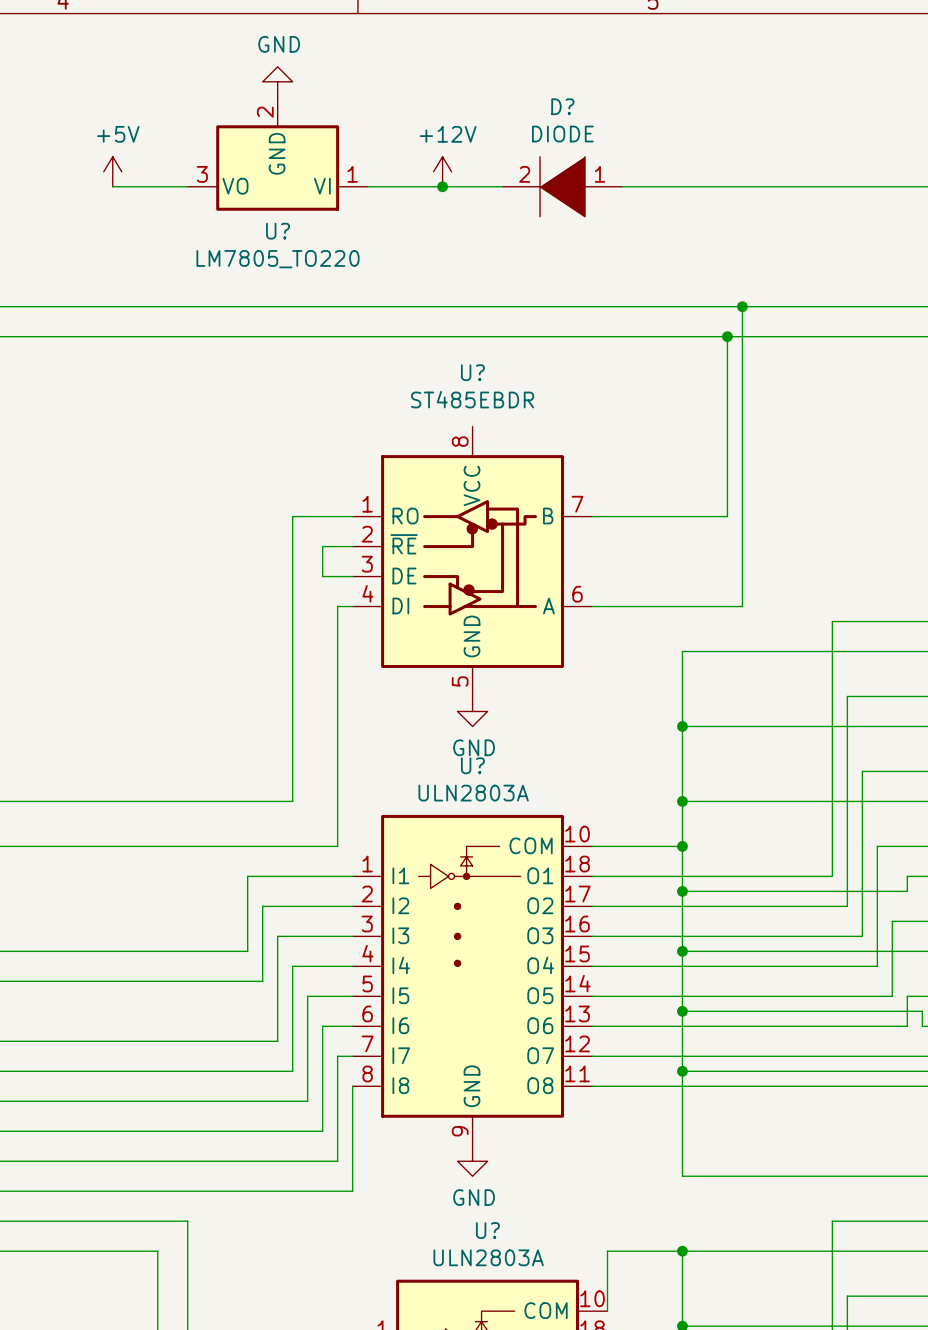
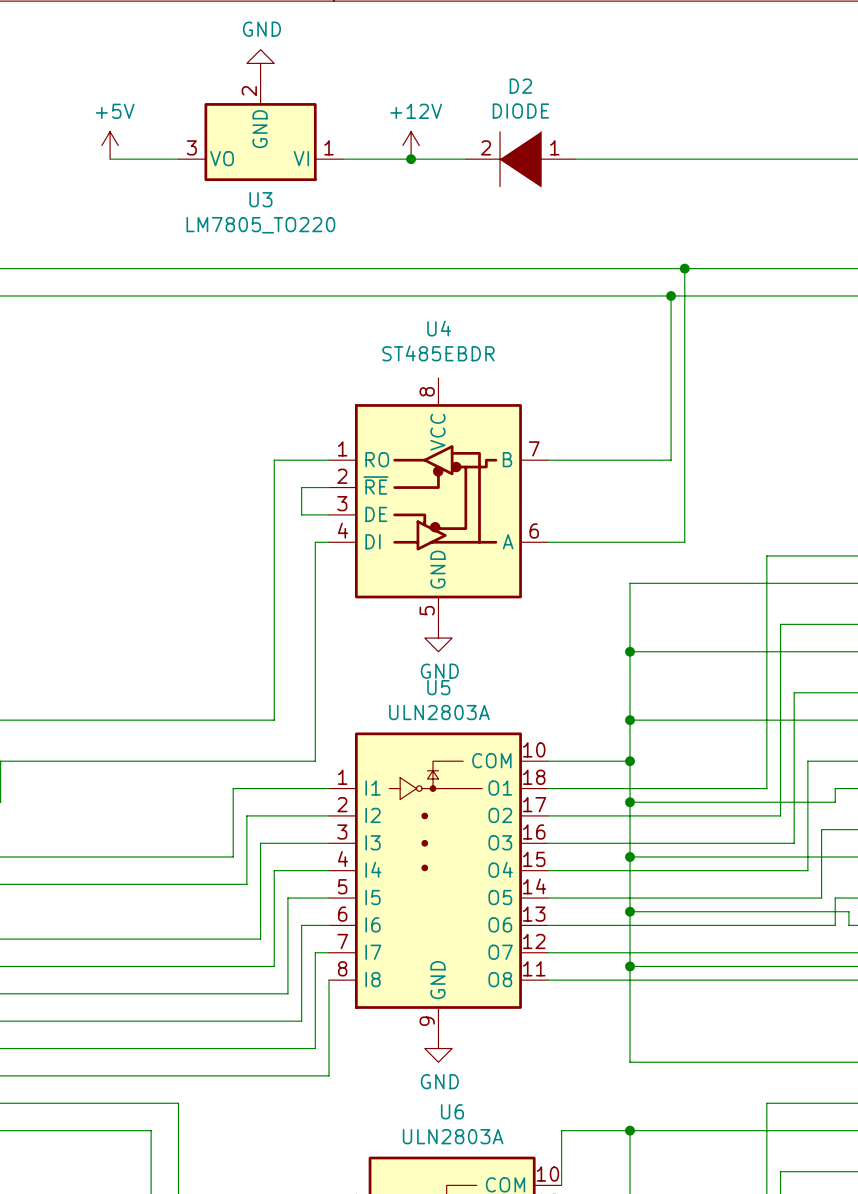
D? name: D? (562, 106) -> D2 (520, 86)
U? name: U? (278, 231) -> U3 (260, 199)
U? name: U? (472, 372) -> U4 (439, 328)
U? name: U? (472, 765) -> U5 (438, 687)
U? name: U? (487, 1230) -> U6 (452, 1111)

